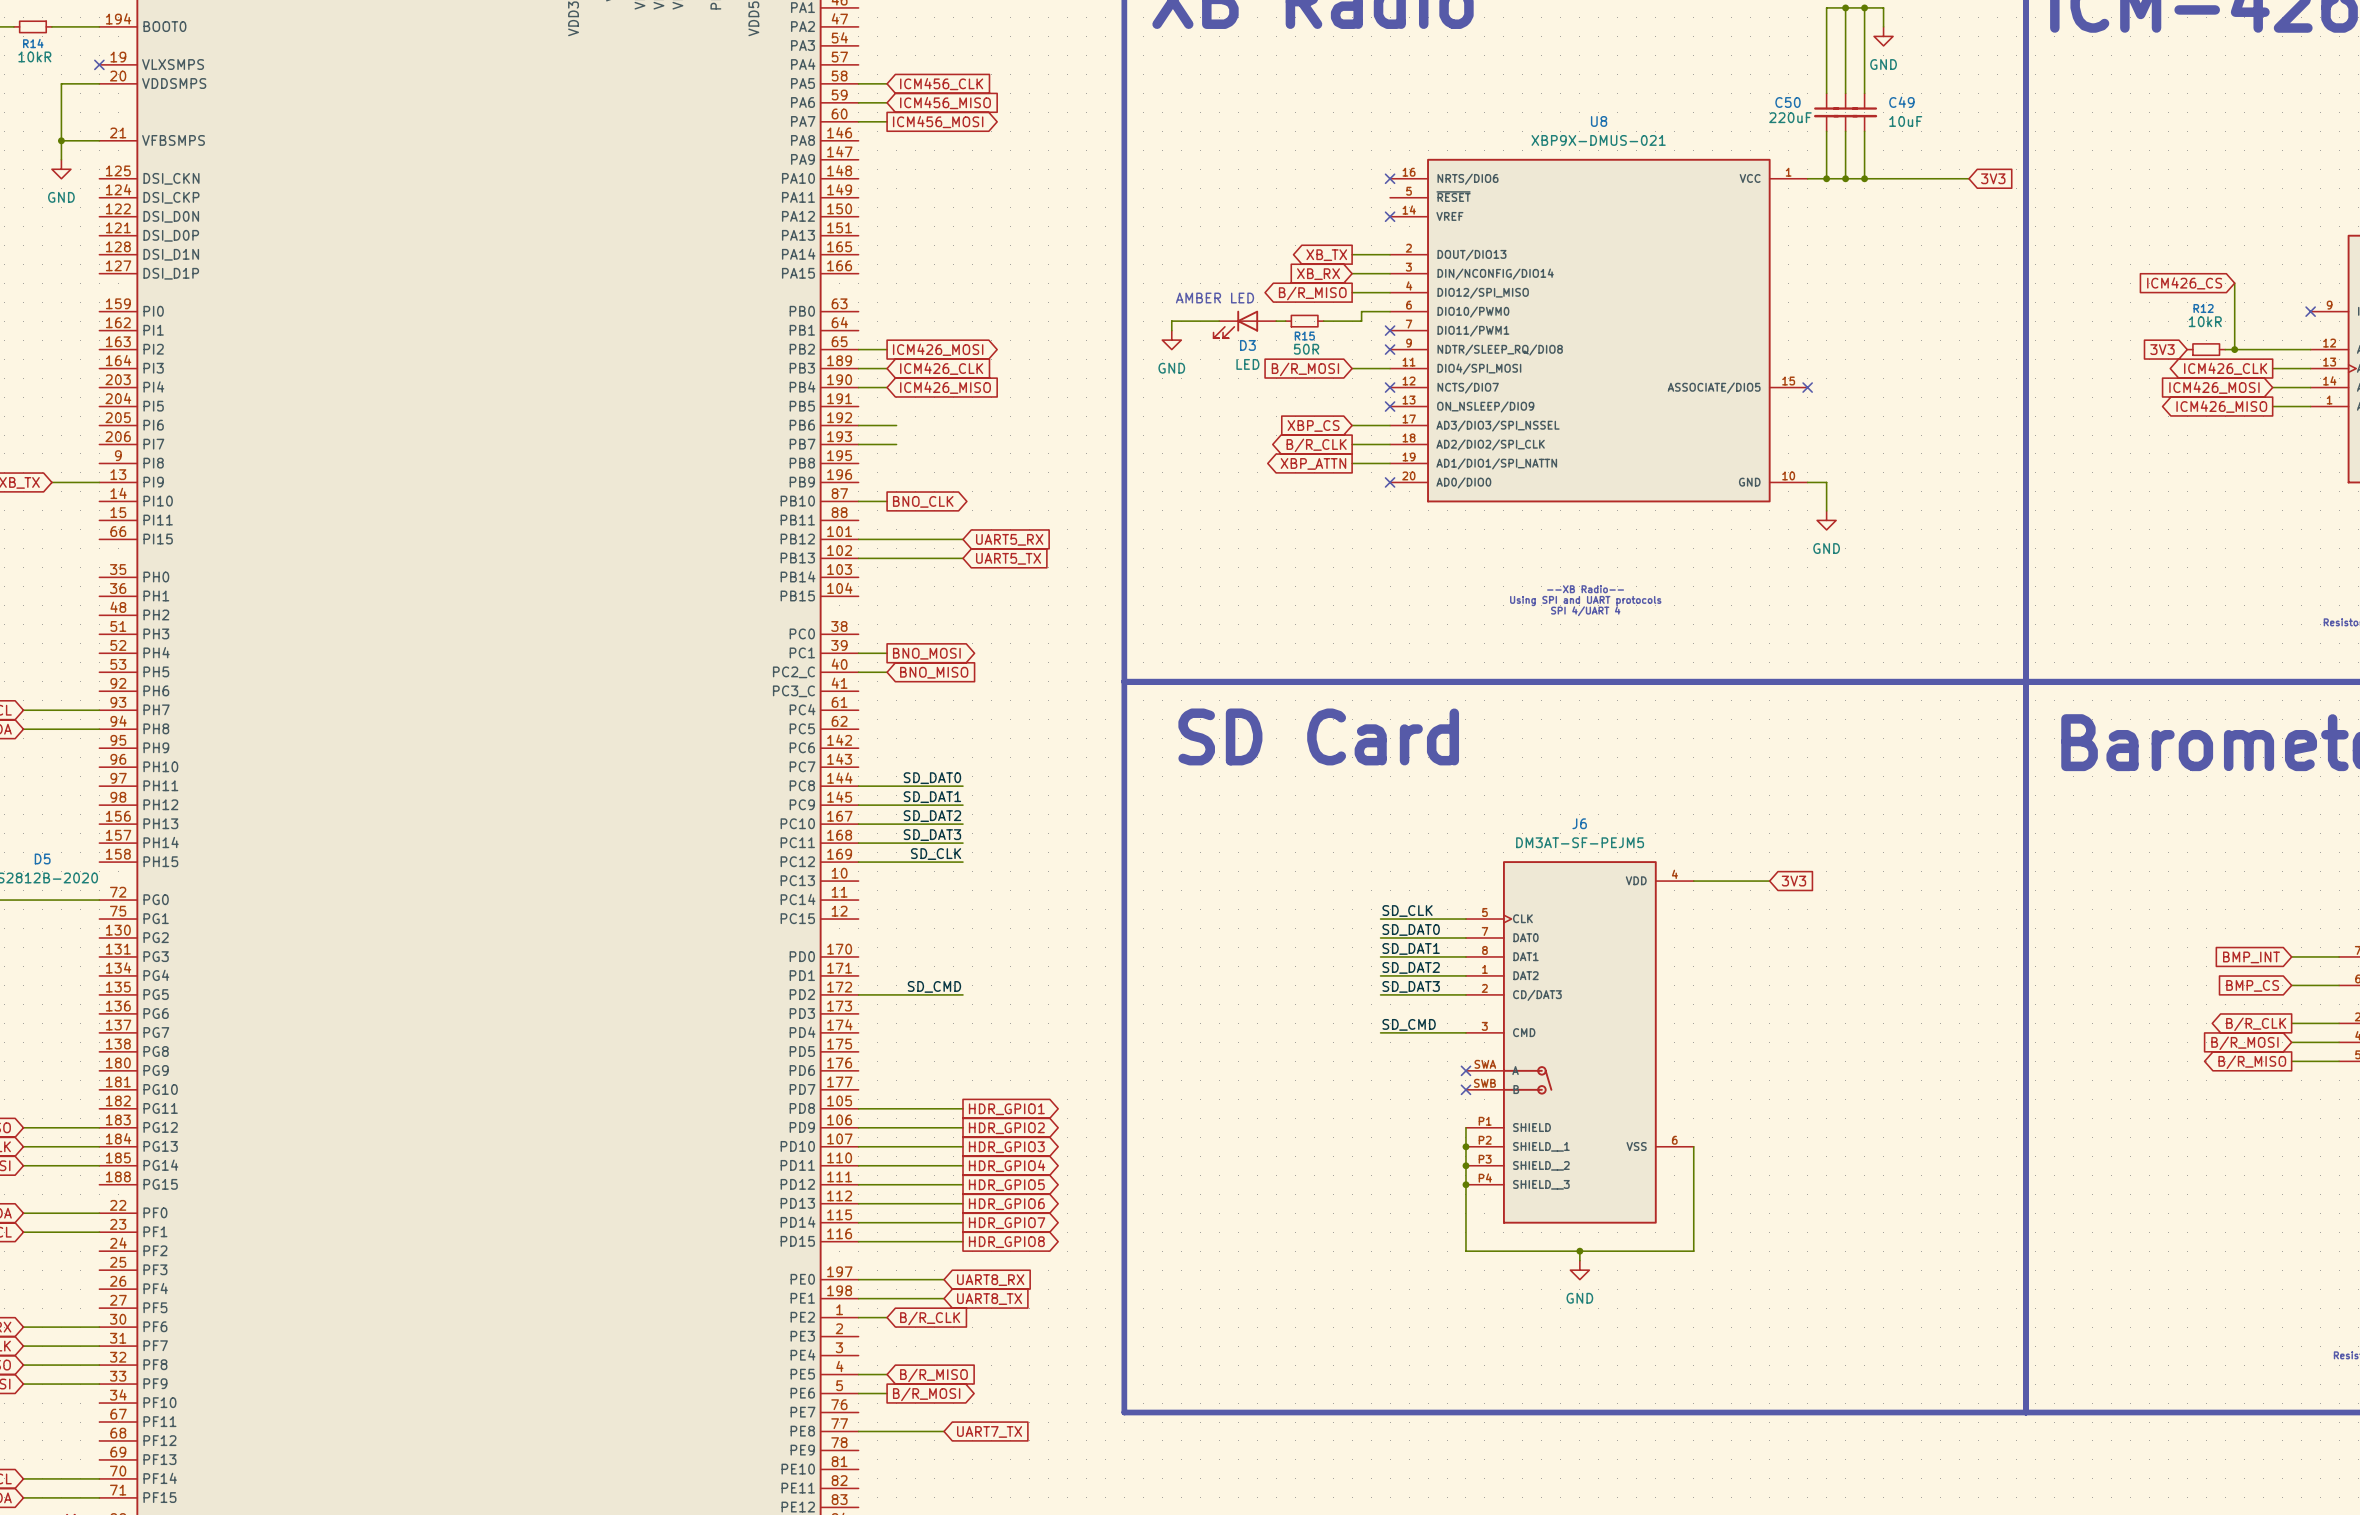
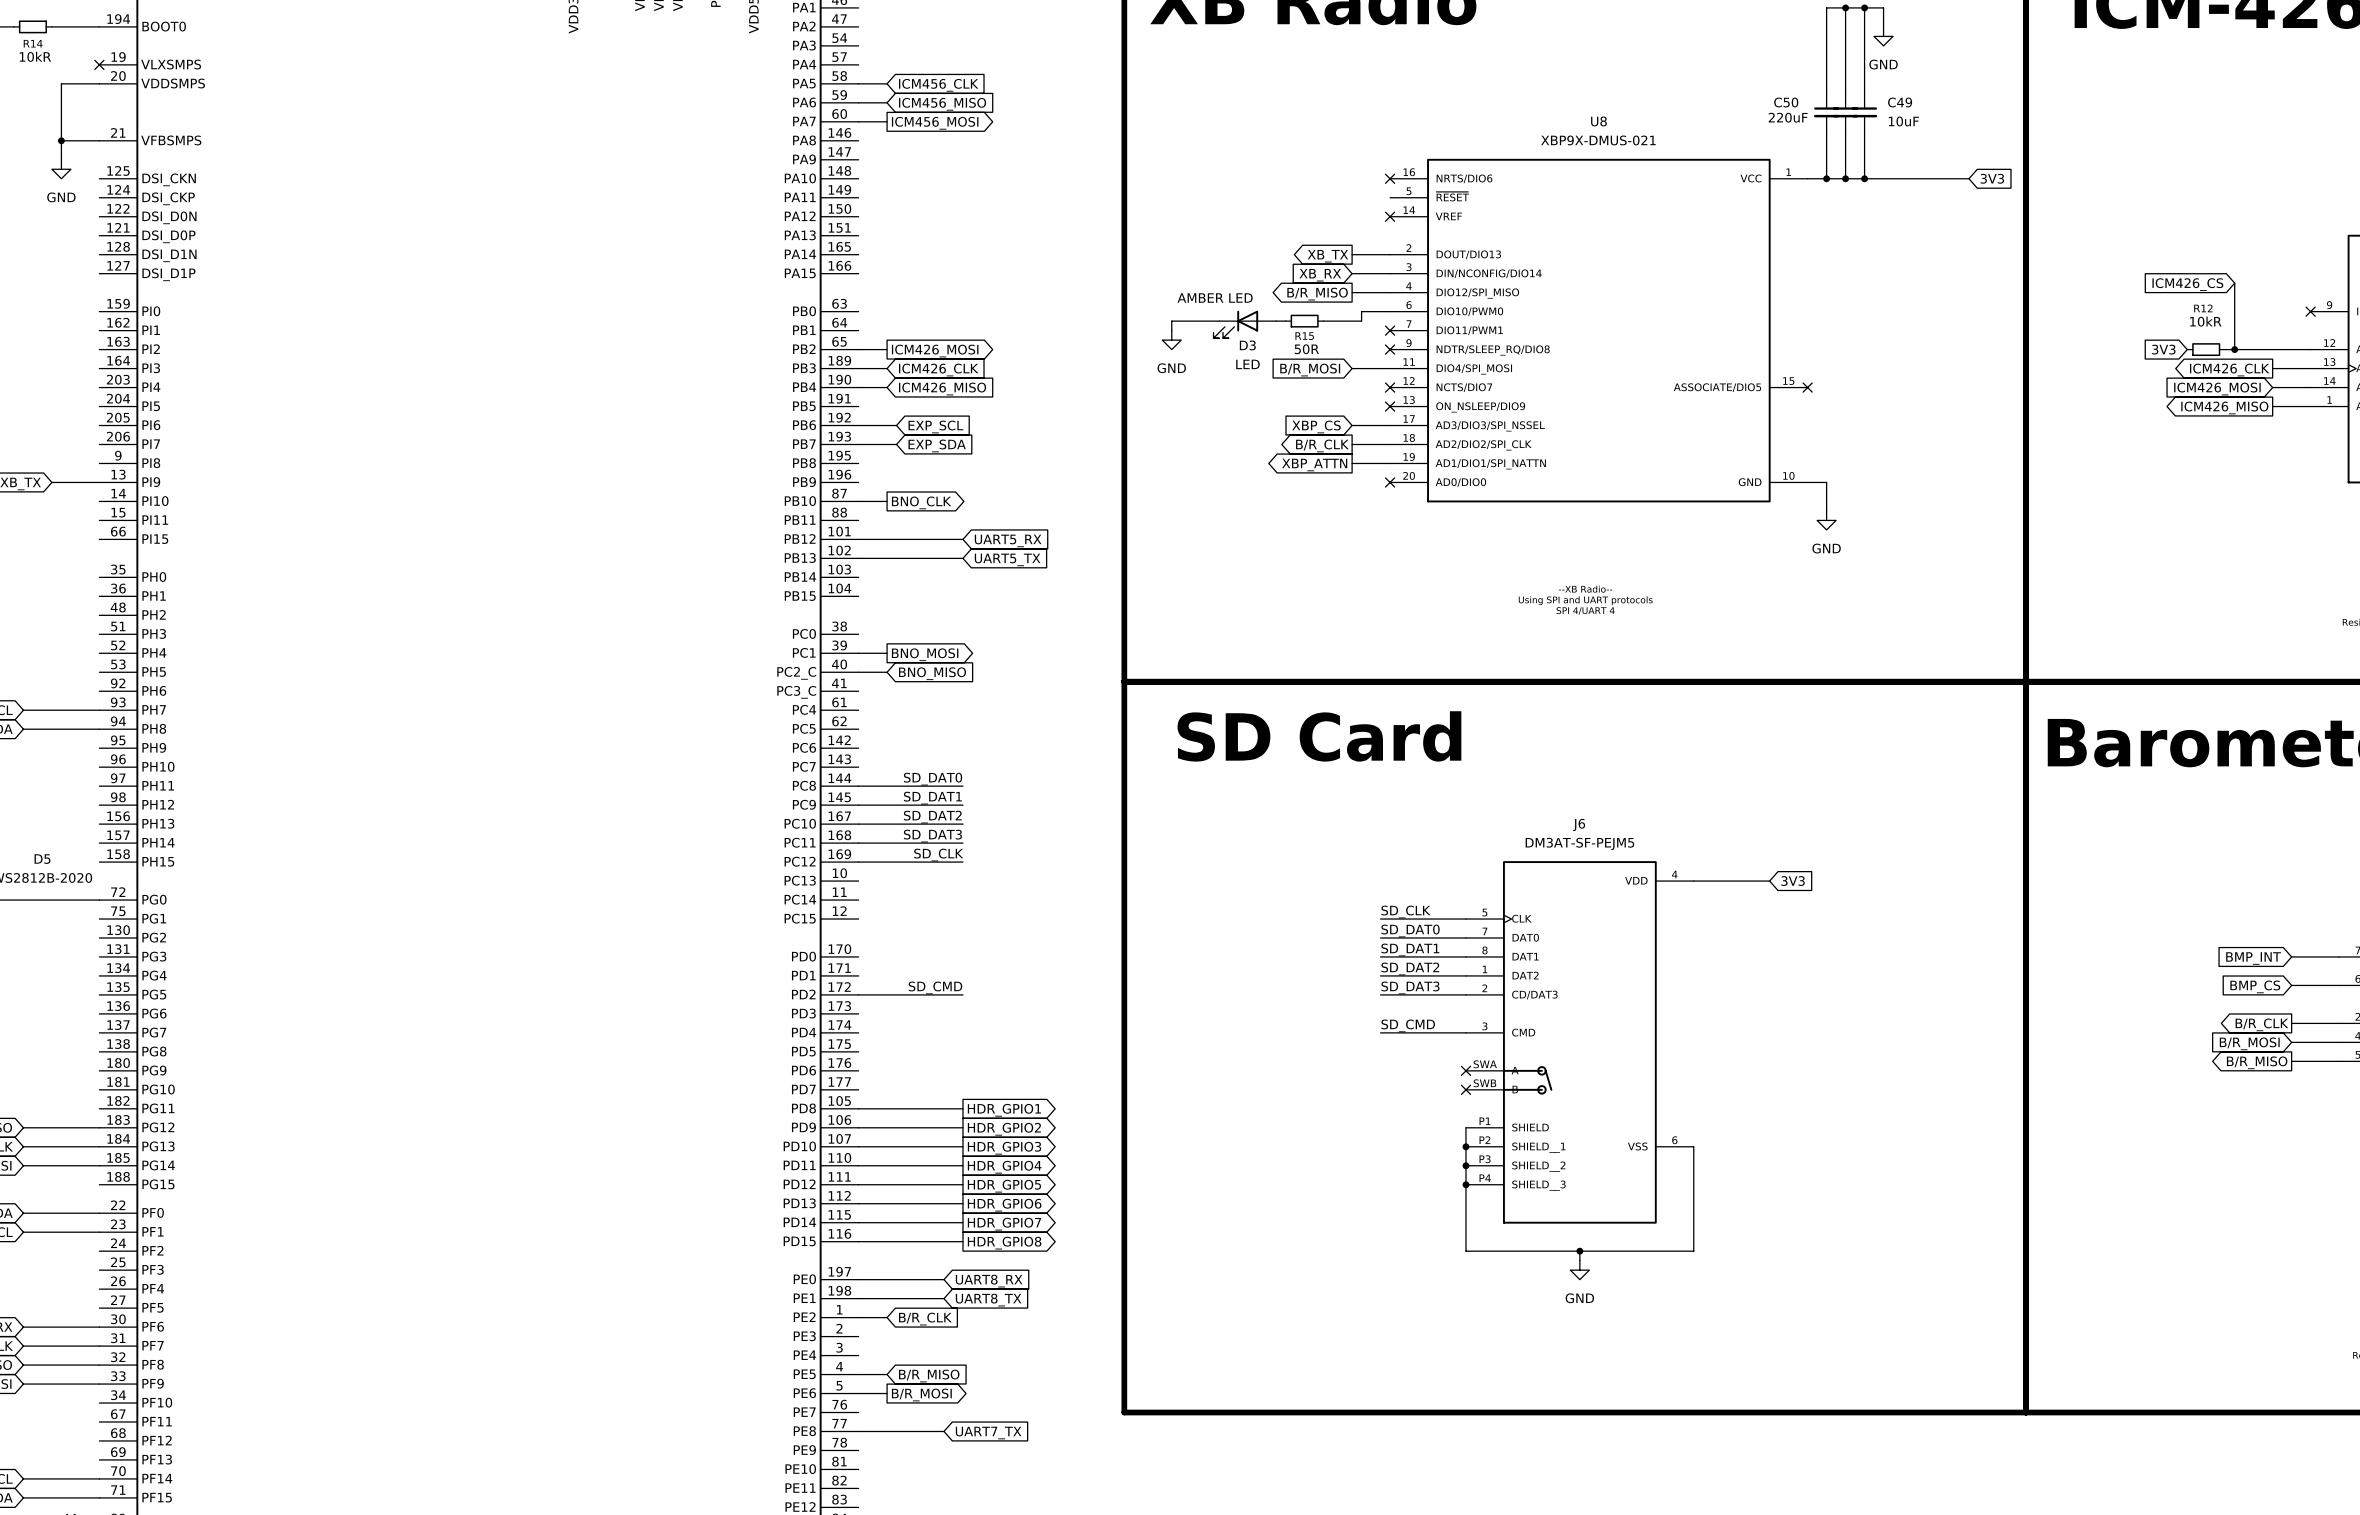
global label: none -> EXP_SCL (935, 426)
global label: none -> EXP_SDA (937, 445)

